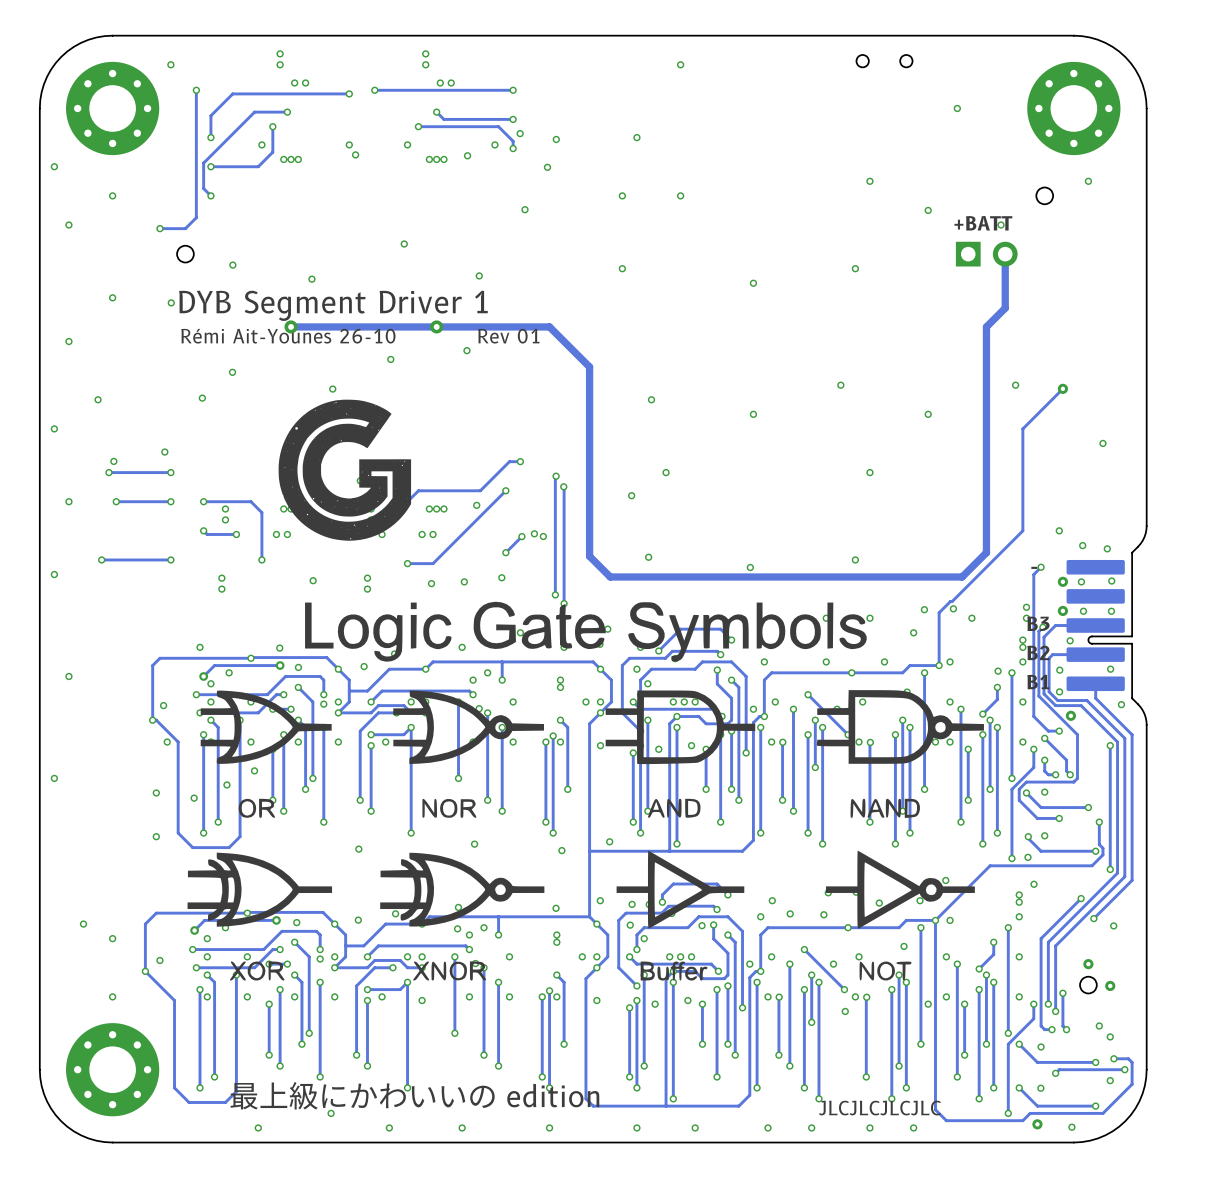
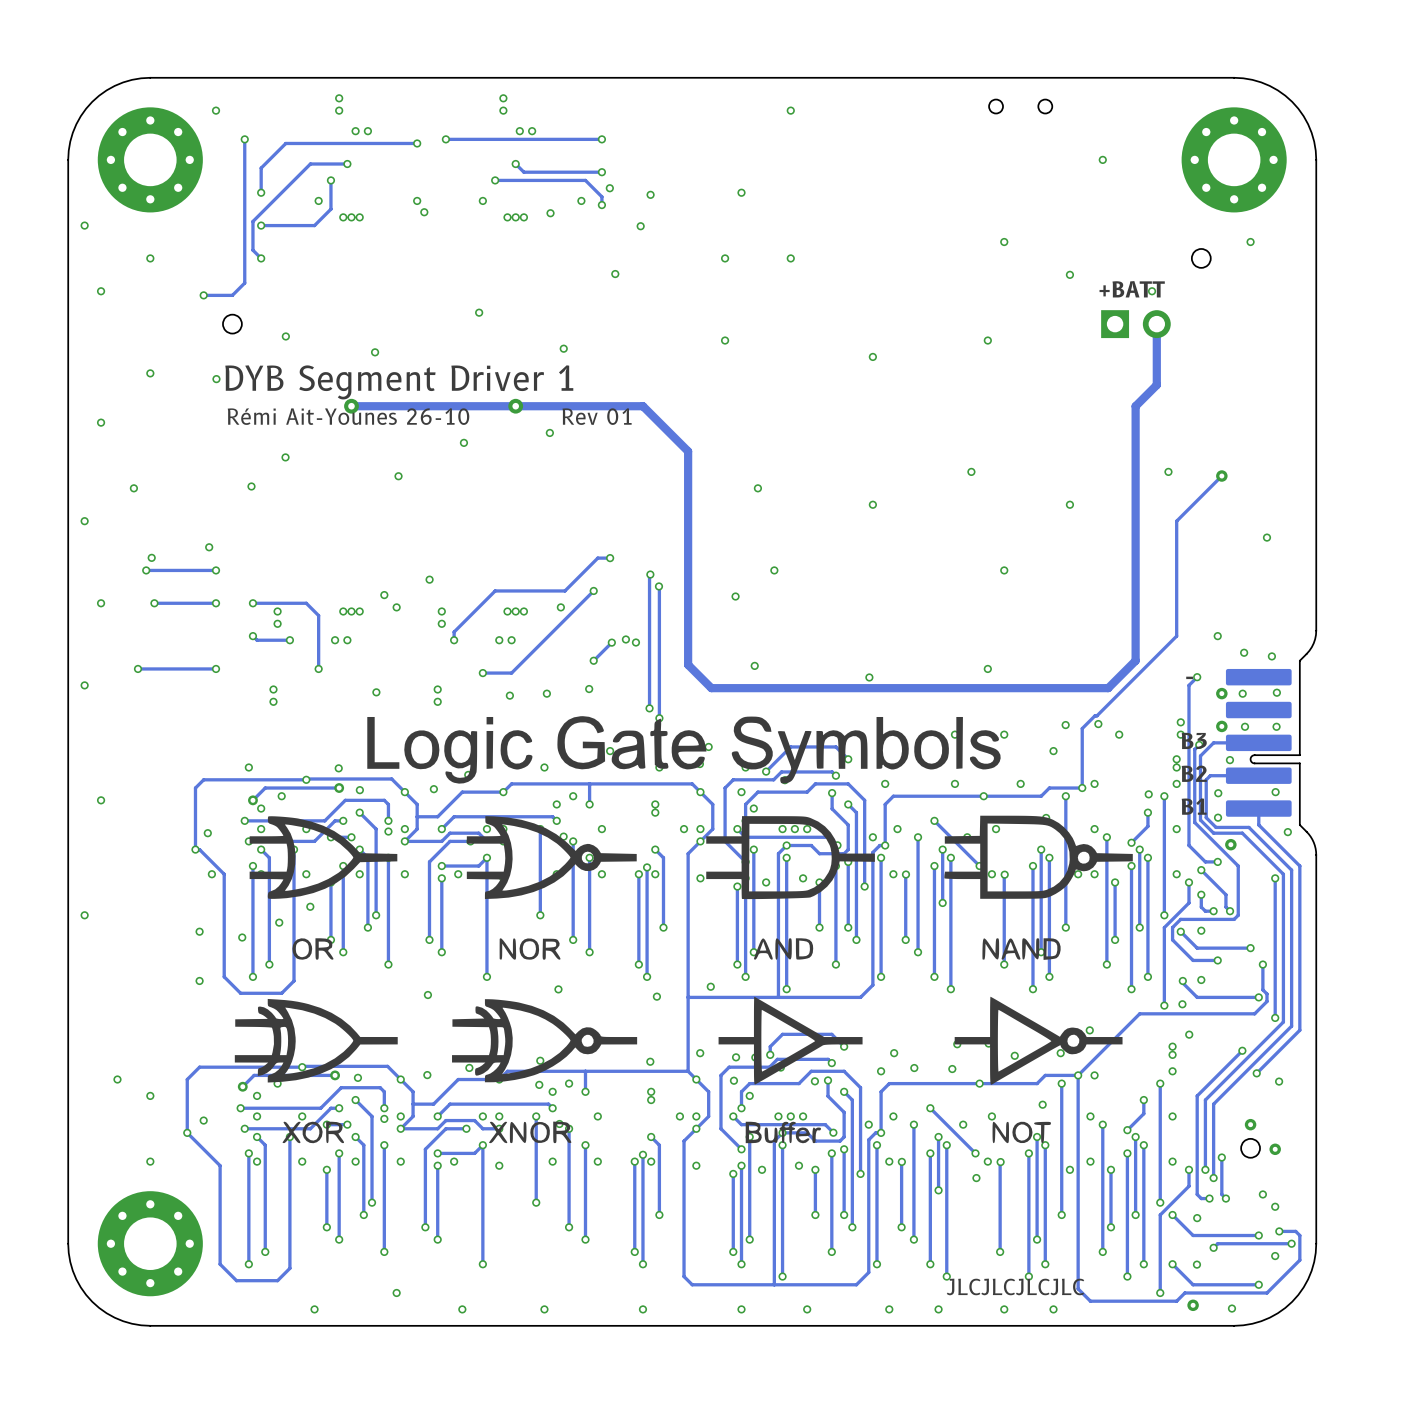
drawing: [278, 399, 412, 541] -> none
text: 最上級にかわいいの (362, 1095) -> none
text: edition (553, 1095) -> none

